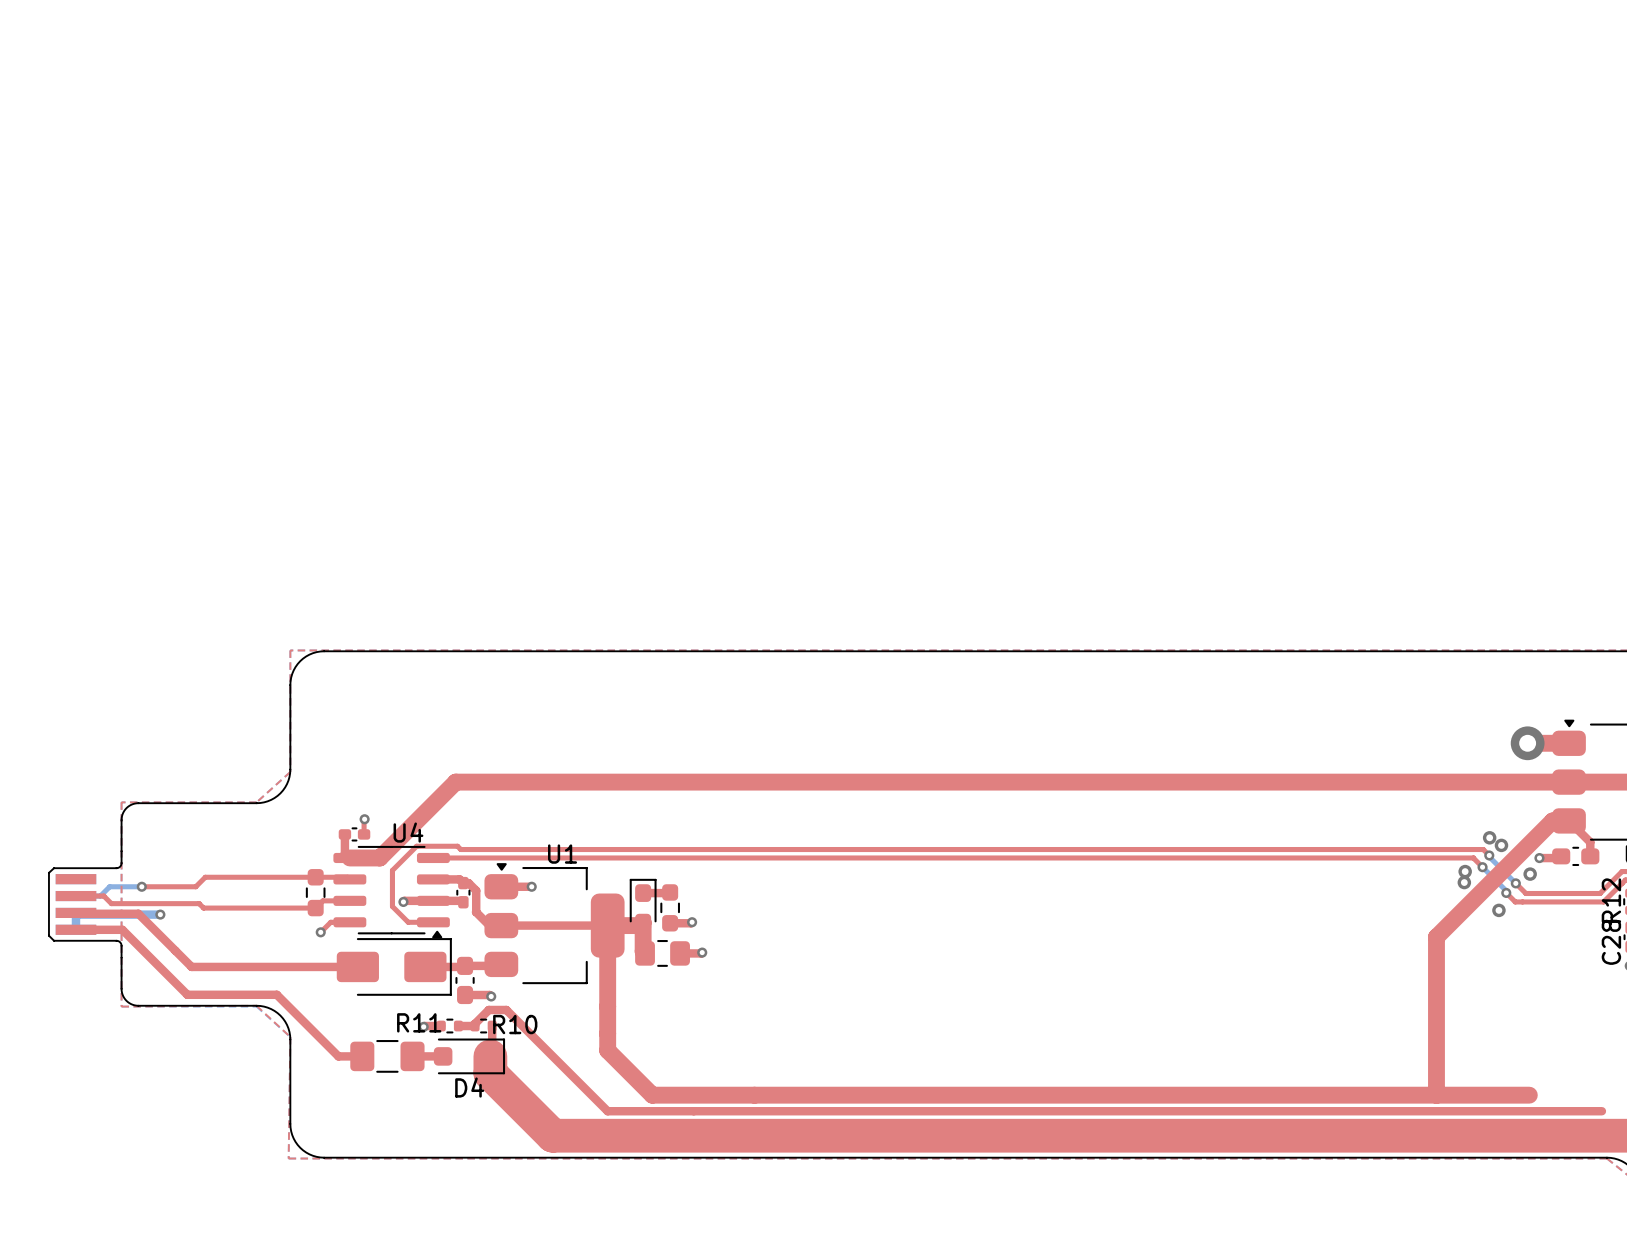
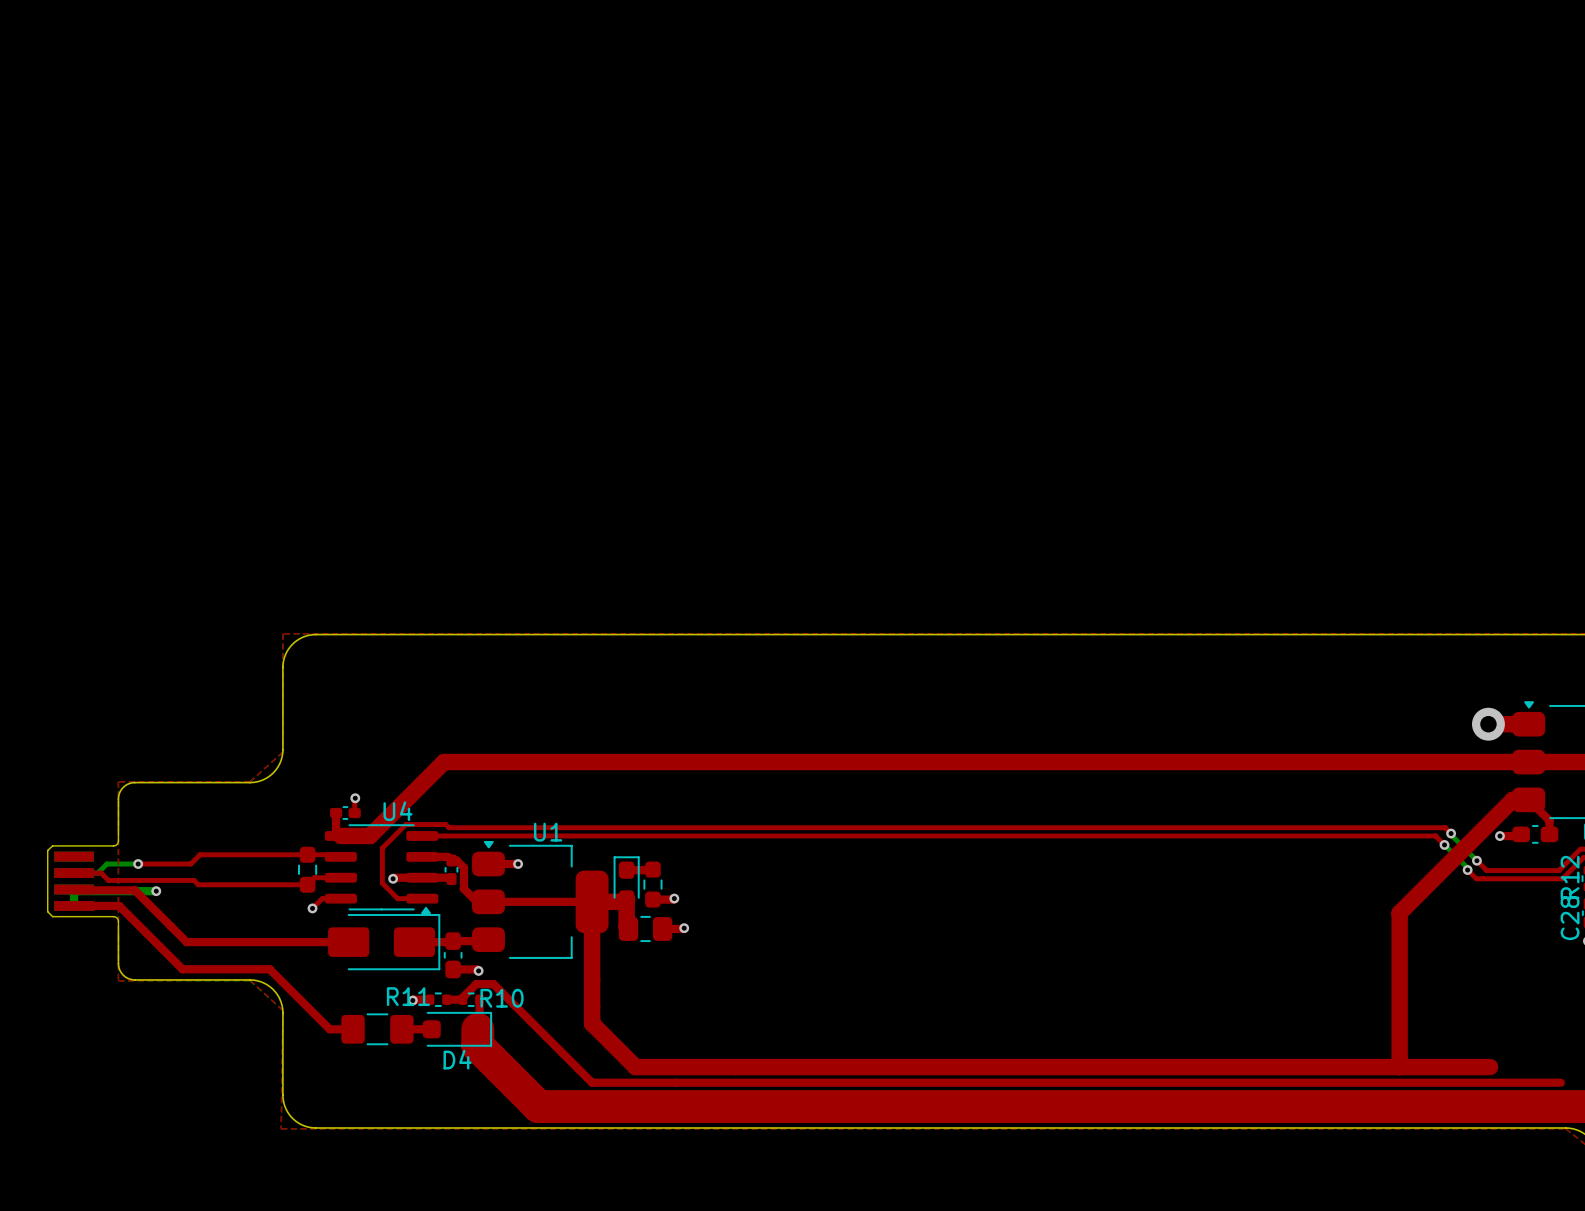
via: (1489, 837) -> none
via: (1501, 845) -> none
via: (1465, 871) -> none
via: (1530, 874) -> none
via: (1464, 882) -> none
via: (1498, 910) -> none

